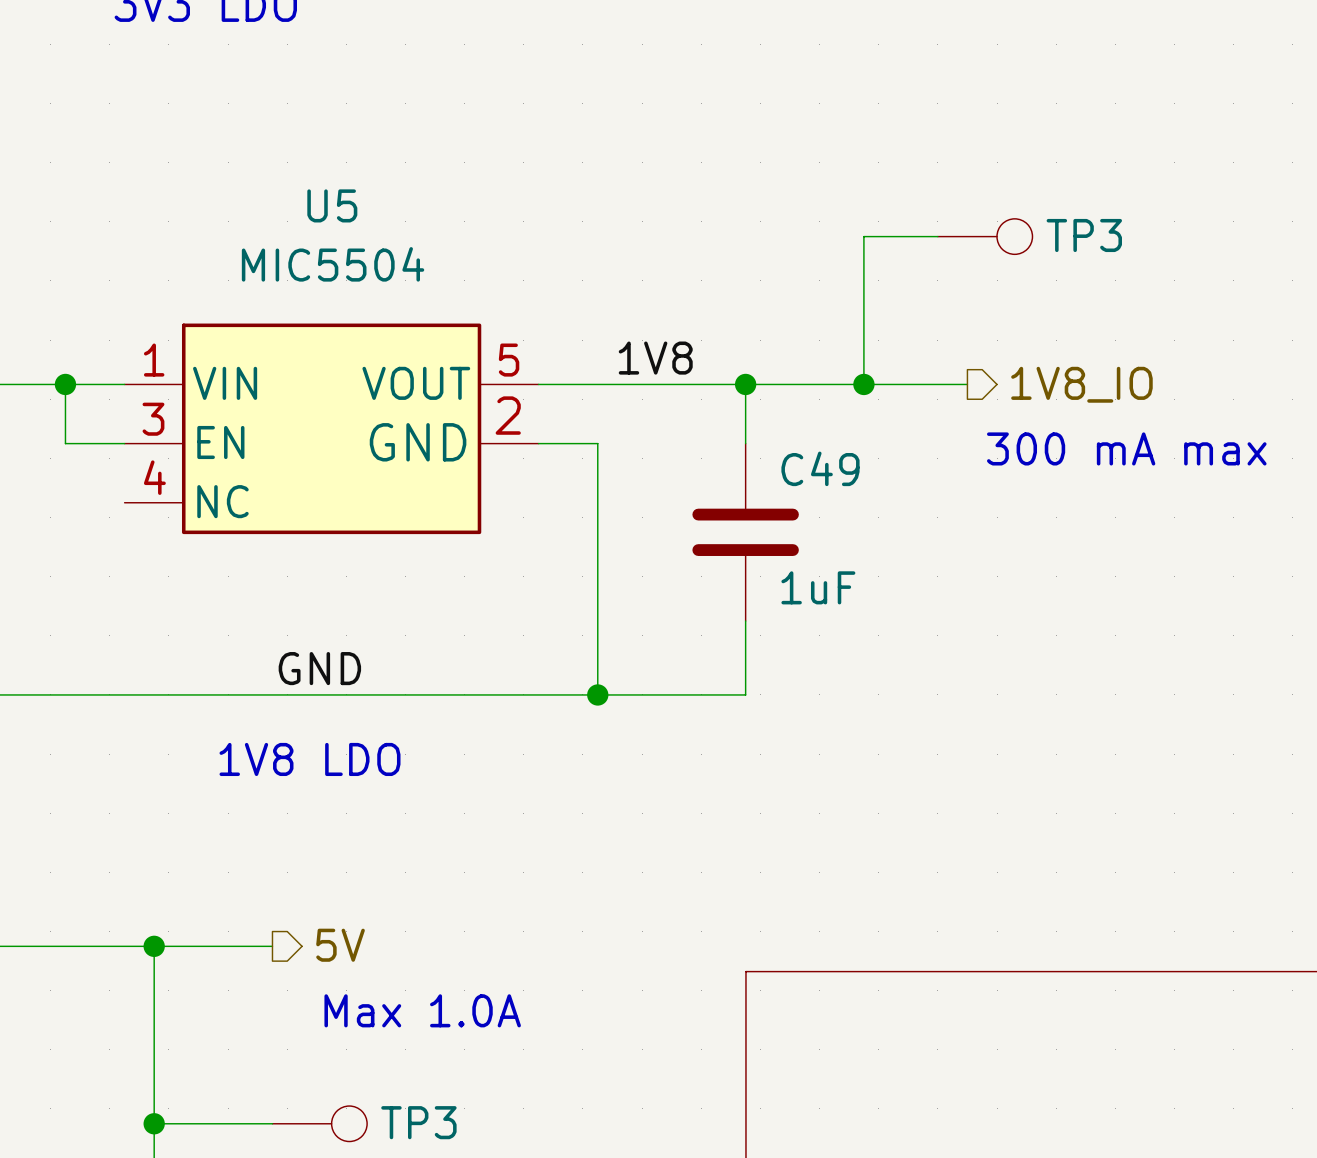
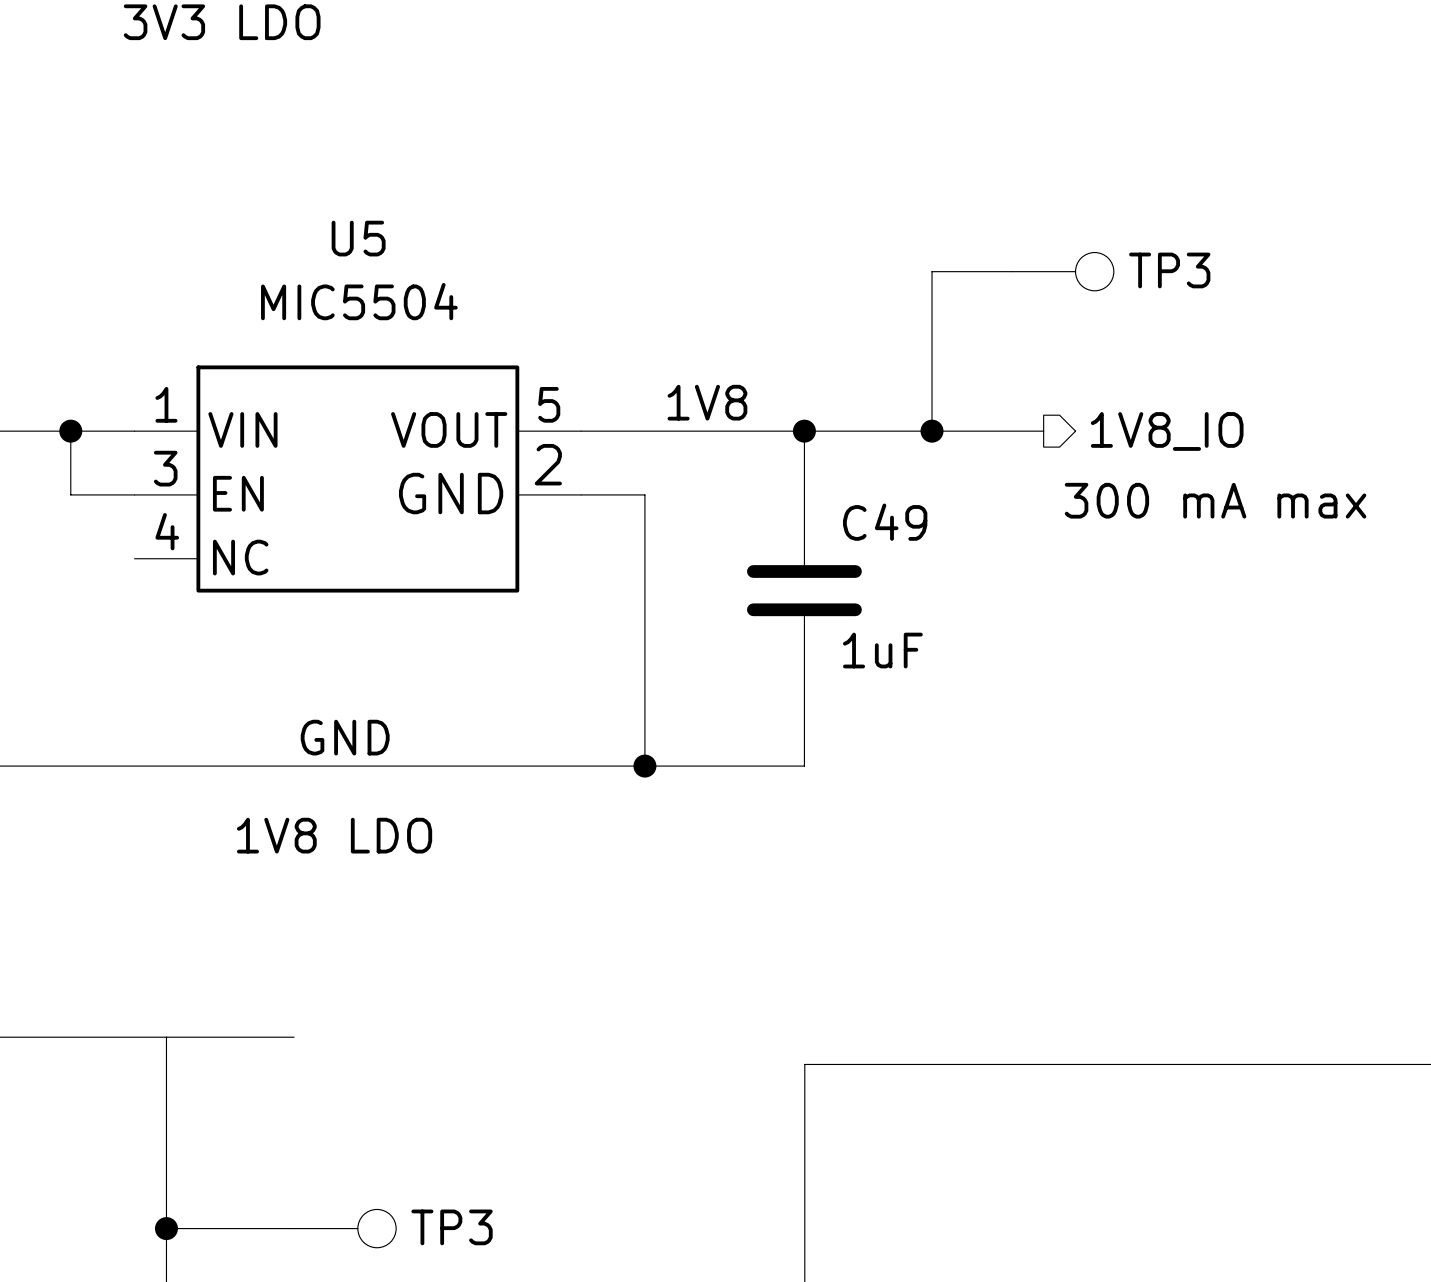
hierarchical label: 5V (340, 945) -> none
junction: (154, 946) -> none
text: Max 1.0A (422, 1010) -> none

